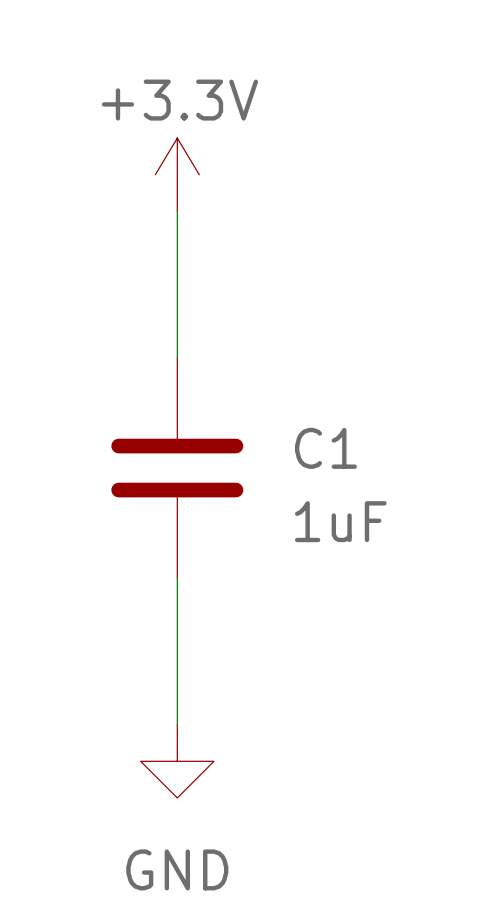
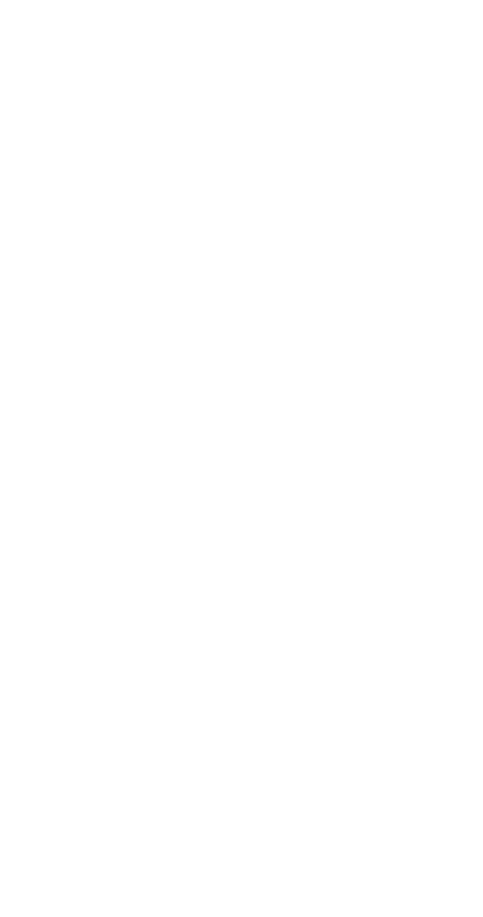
power symbol: +3.3V (177, 174) -> none
wire: (177, 211) (177, 358) -> none
C1: 1uF (177, 468) -> none
wire: (177, 578) (177, 724) -> none
power symbol: GND (177, 761) -> none

